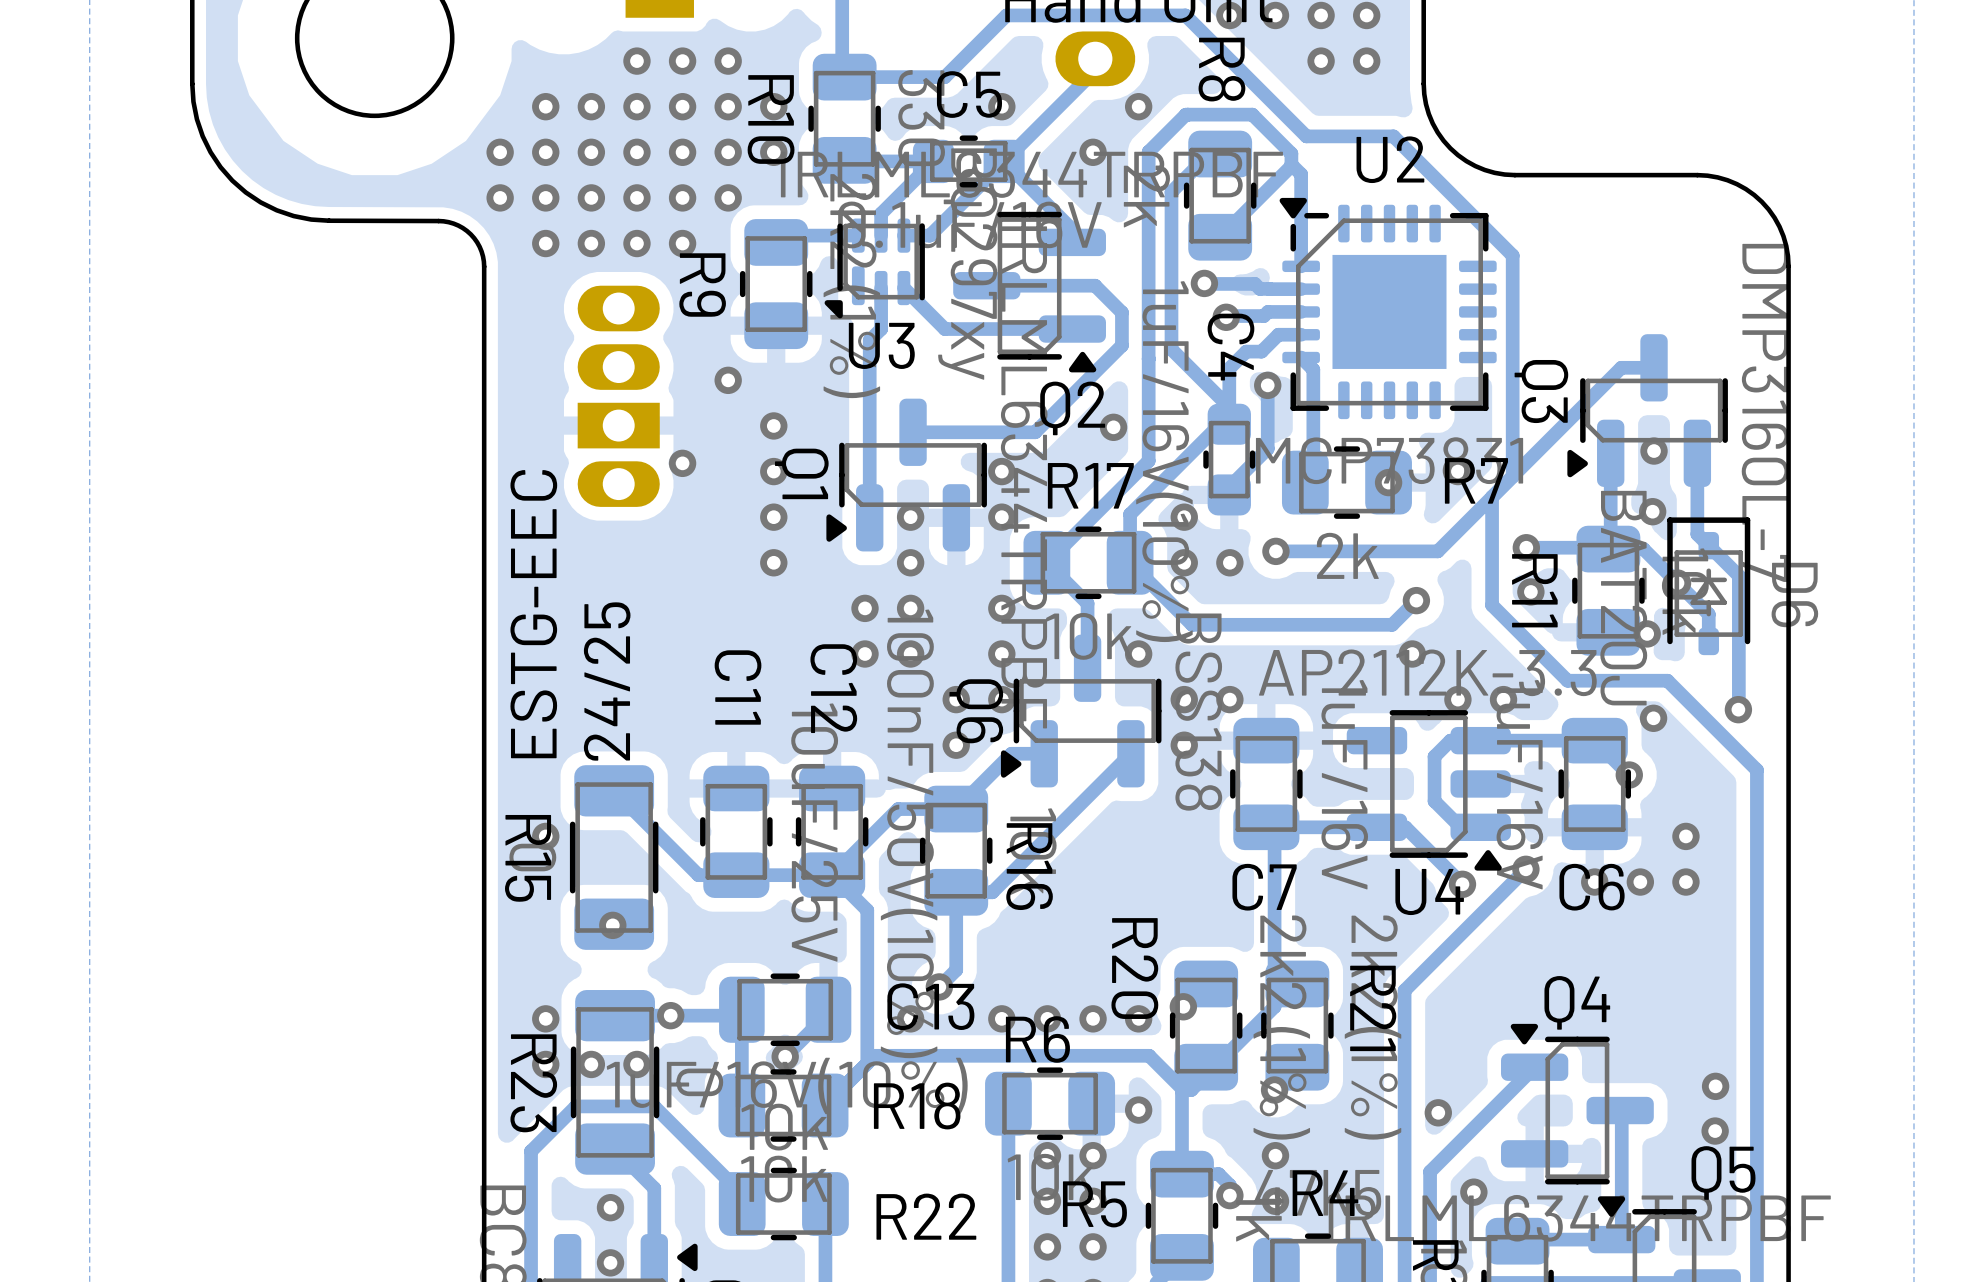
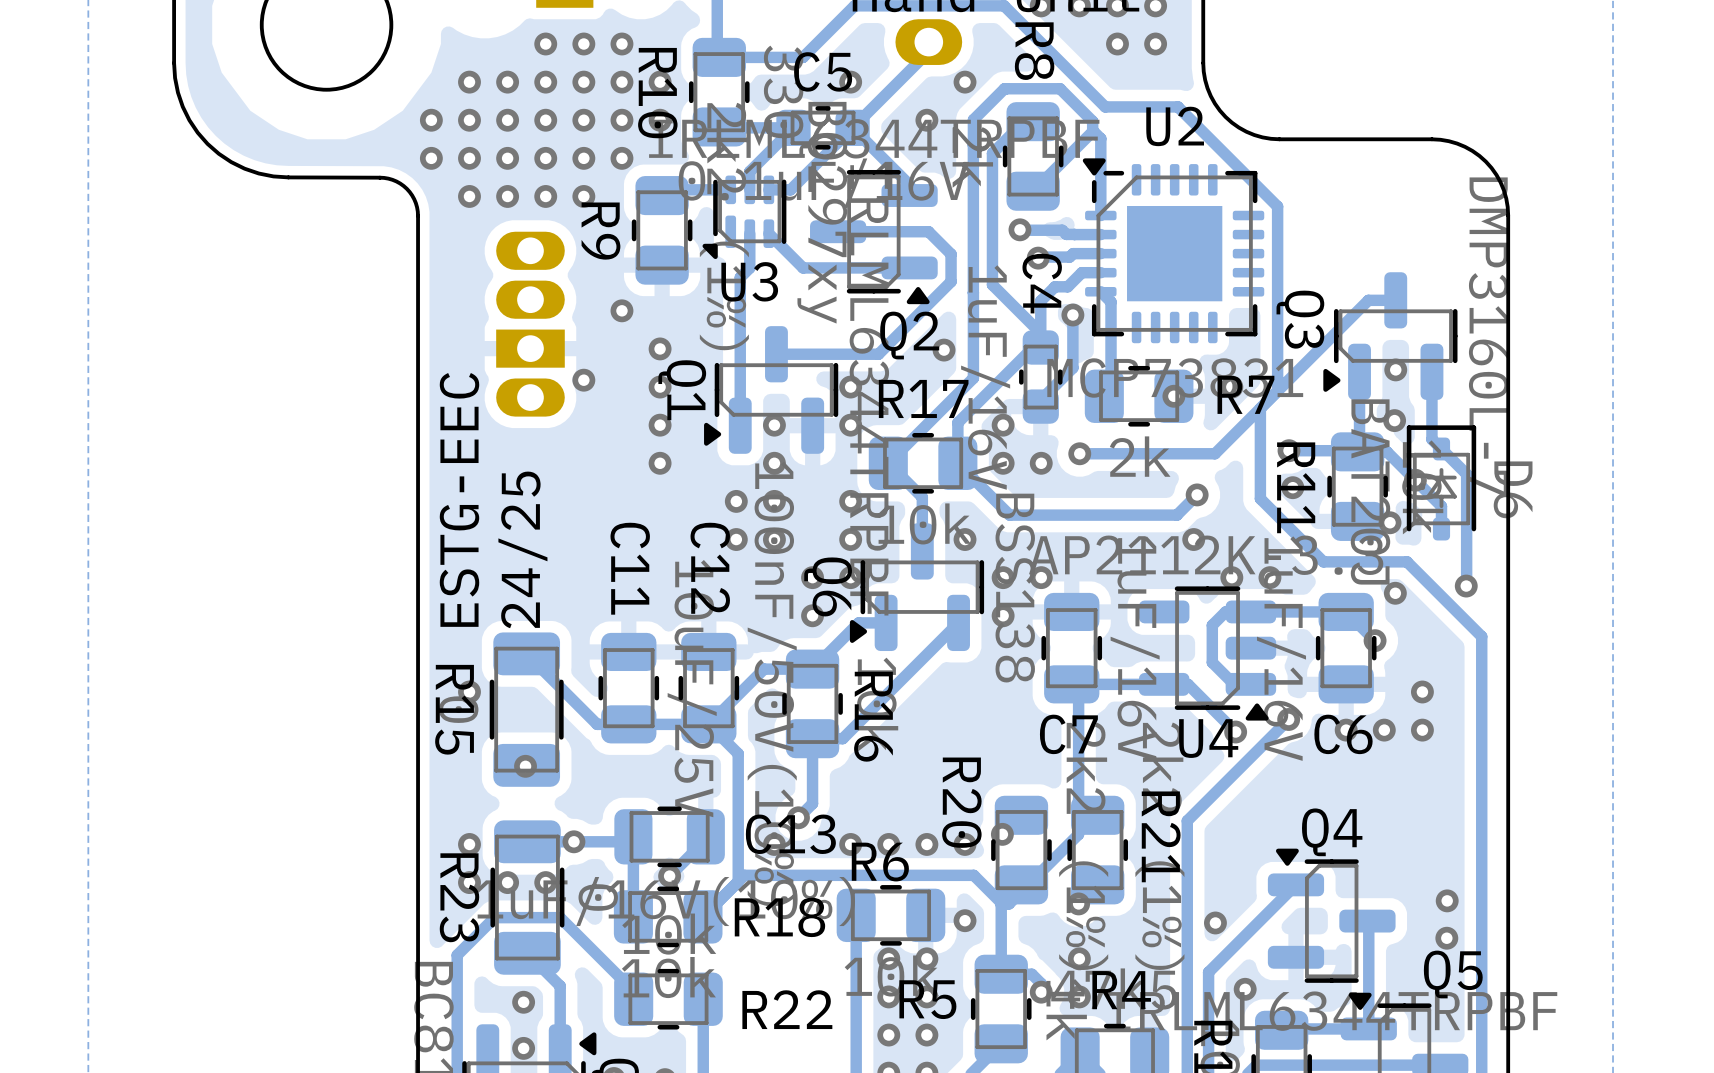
C4 value: 1uF/16V(10%) (1164, 461) -> 1uF/16V (985, 377)

